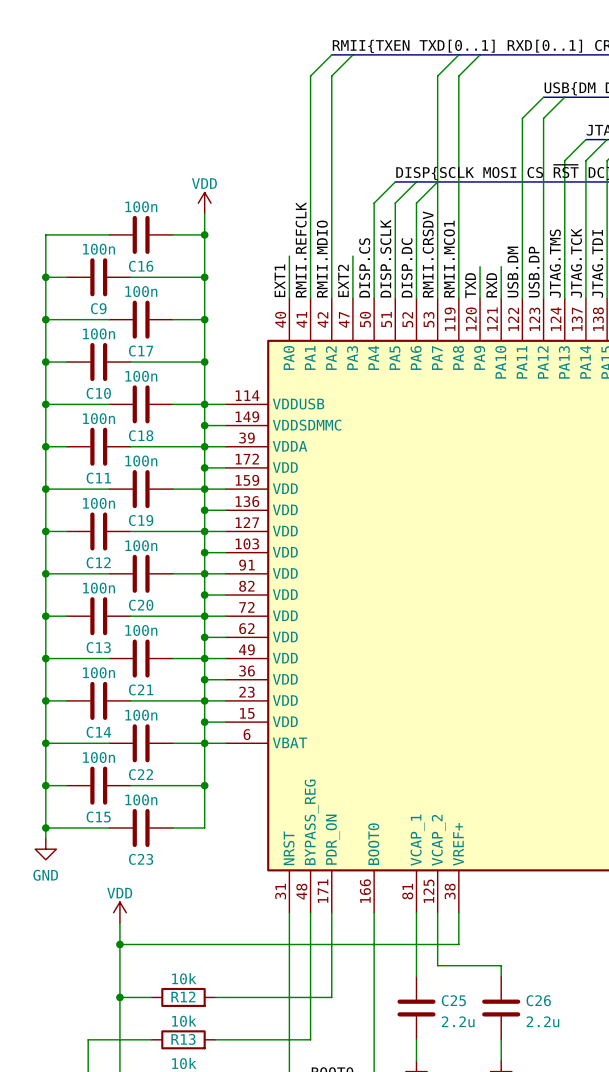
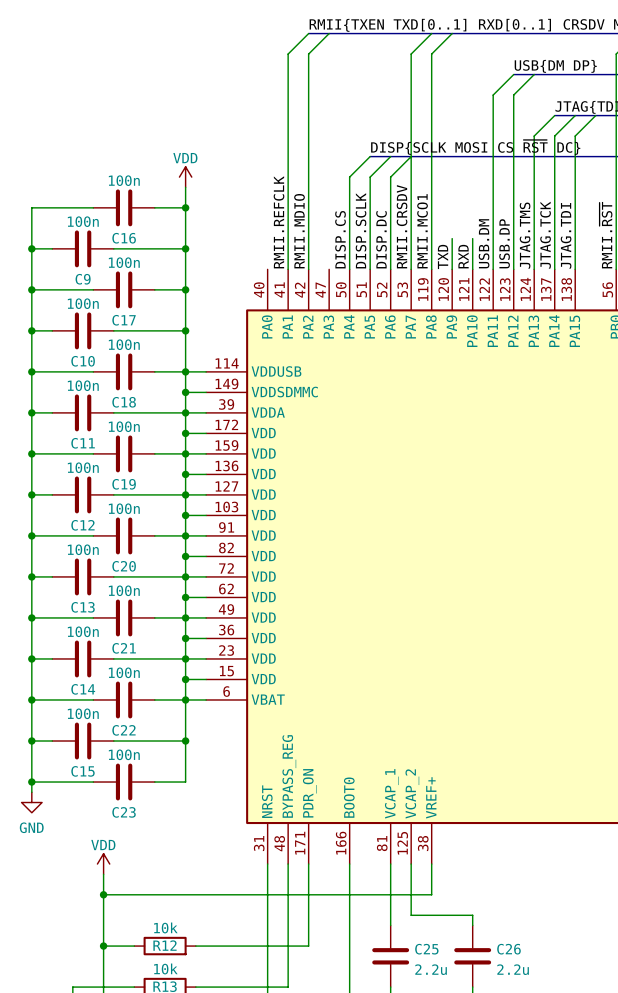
wire: (289, 256) (289, 298) -> none
wire: (352, 256) (352, 298) -> none
label: EXT1 (279, 280) -> none
label: EXT2 (343, 280) -> none

